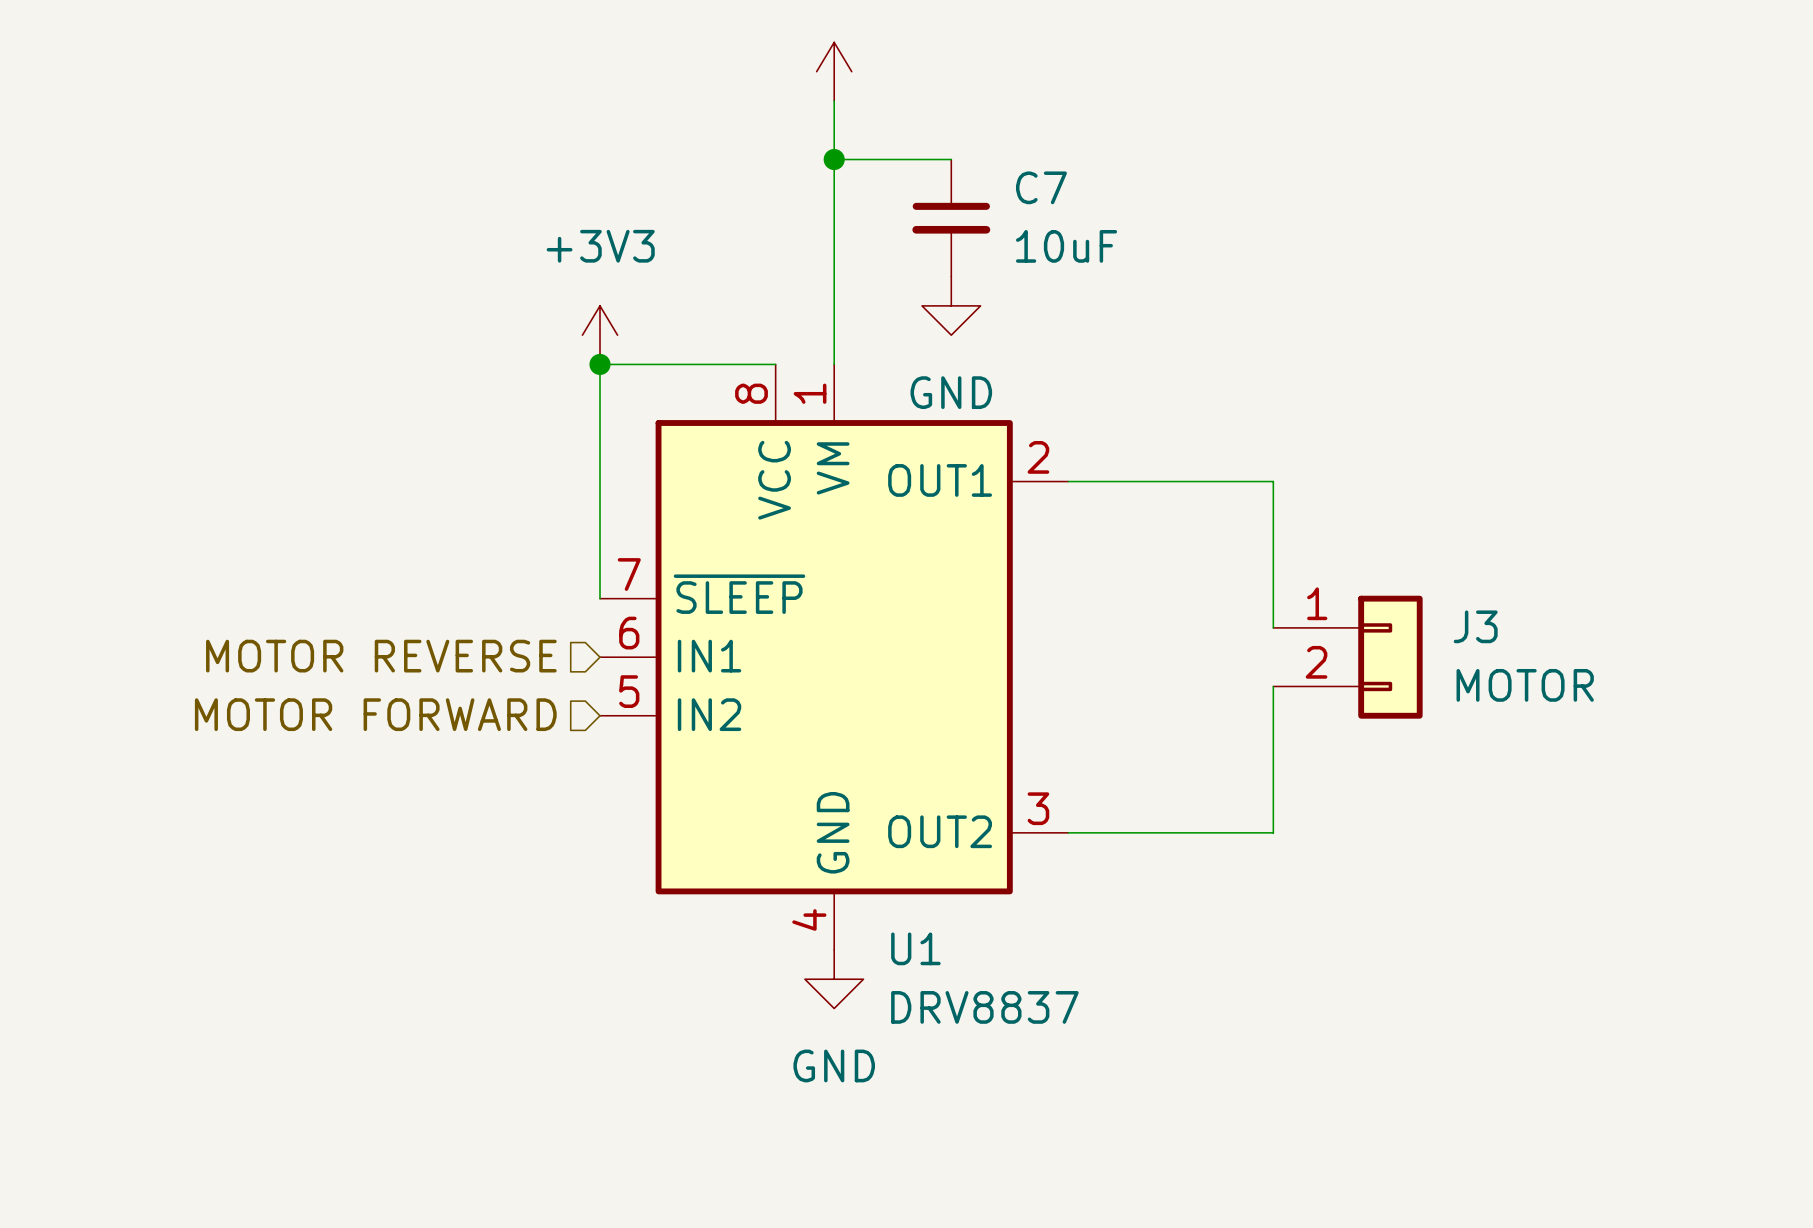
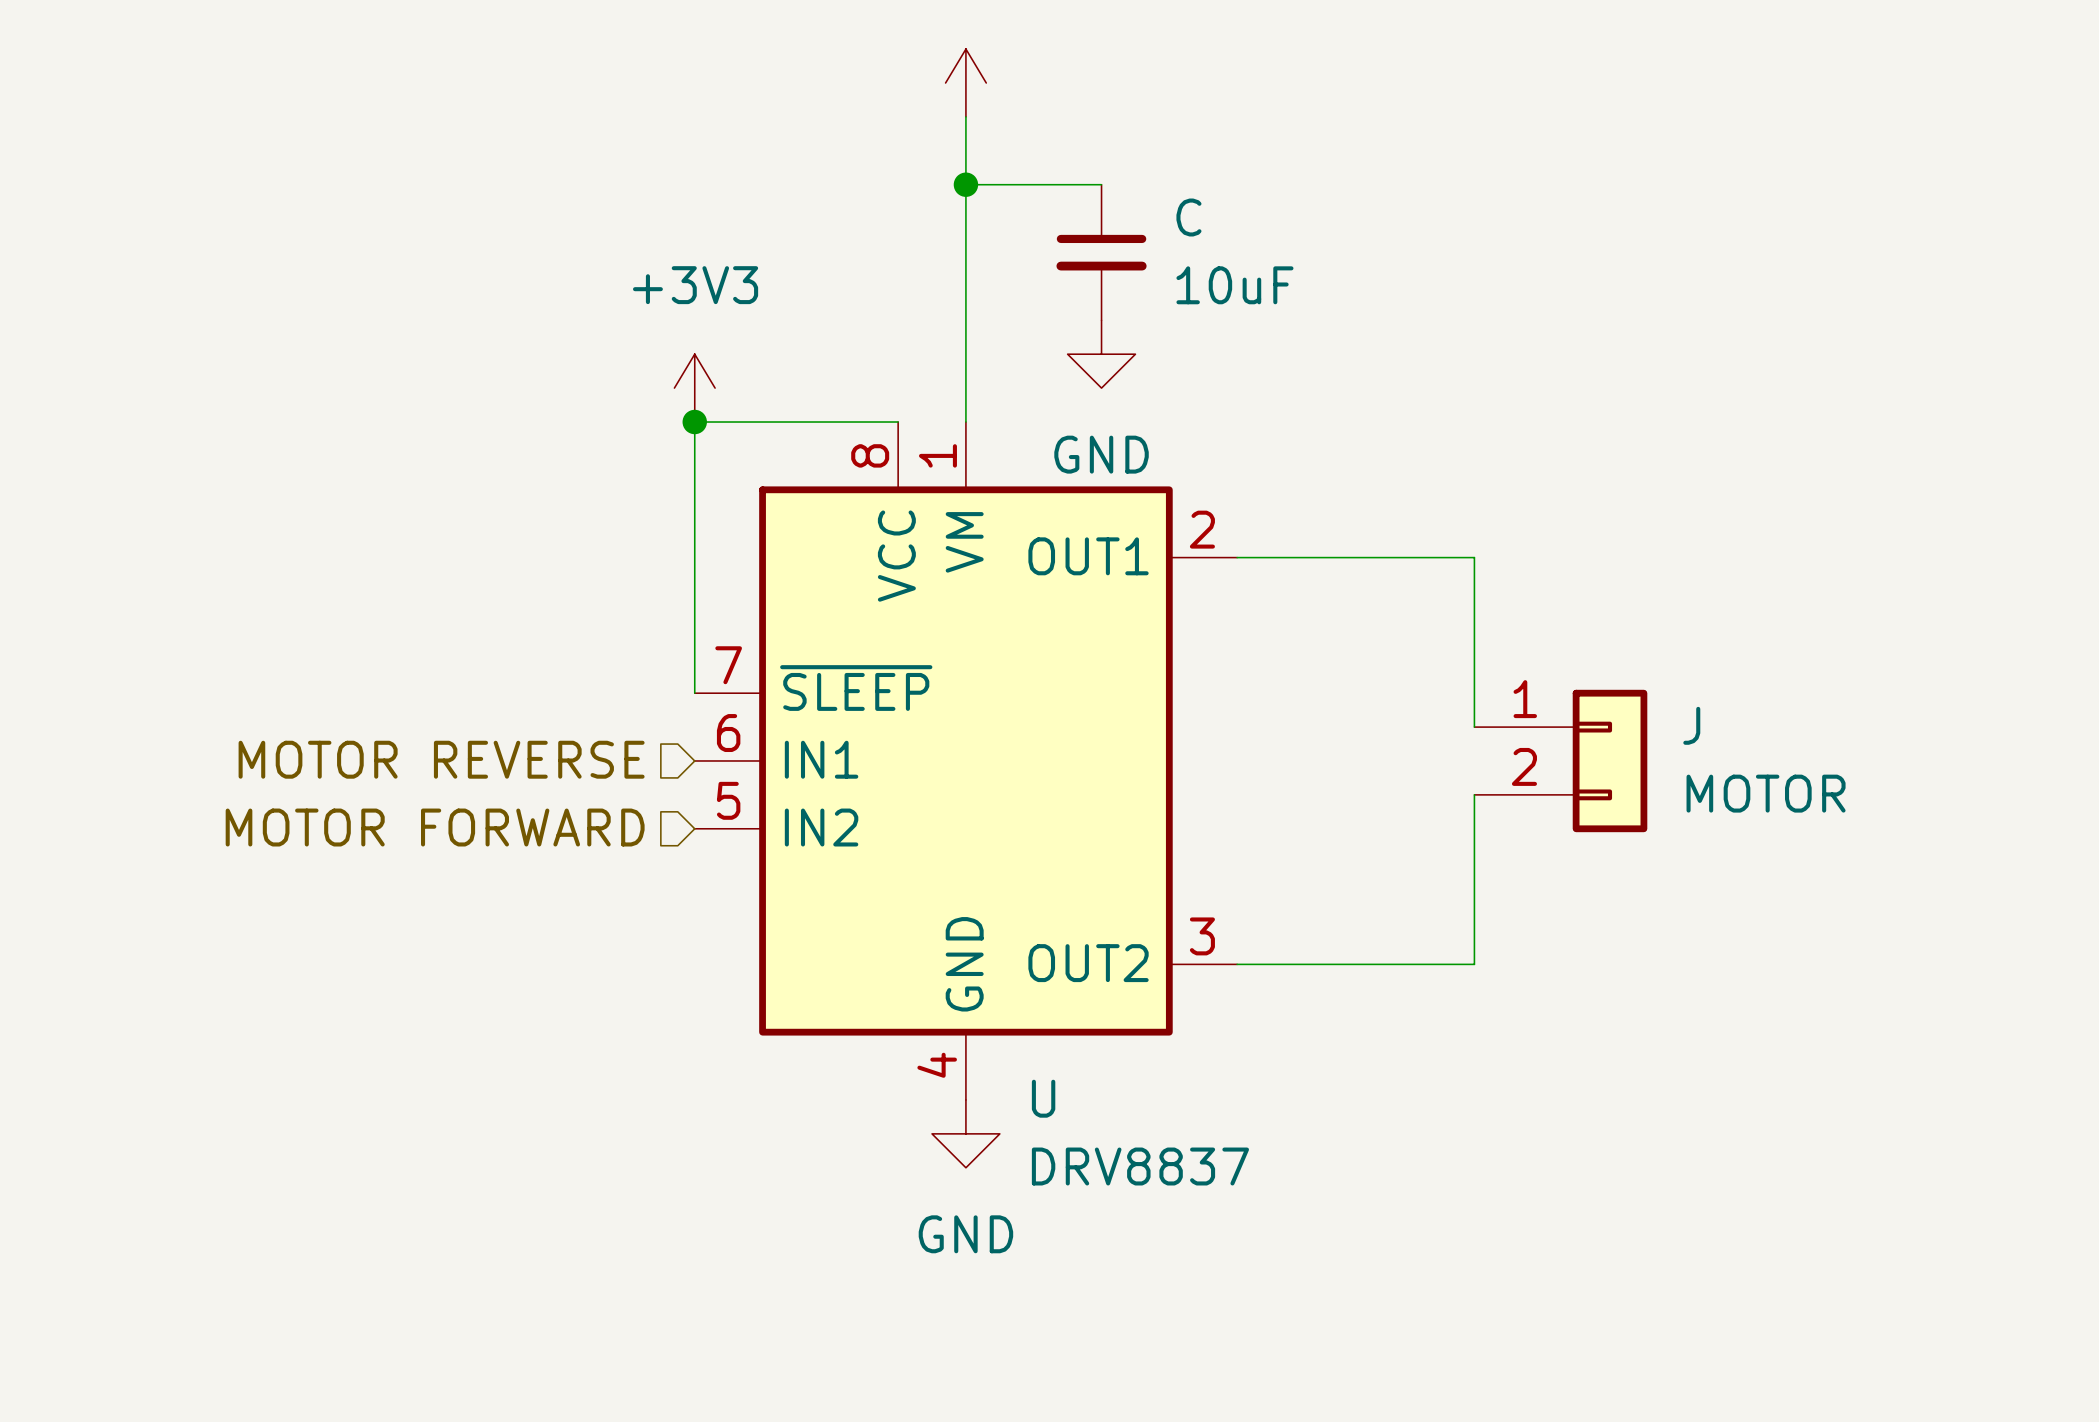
C7 name: C7 (1041, 187) -> C (1188, 217)
J3 name: J3 (1475, 626) -> J (1691, 725)
U1 name: U1 (915, 948) -> U (1043, 1098)

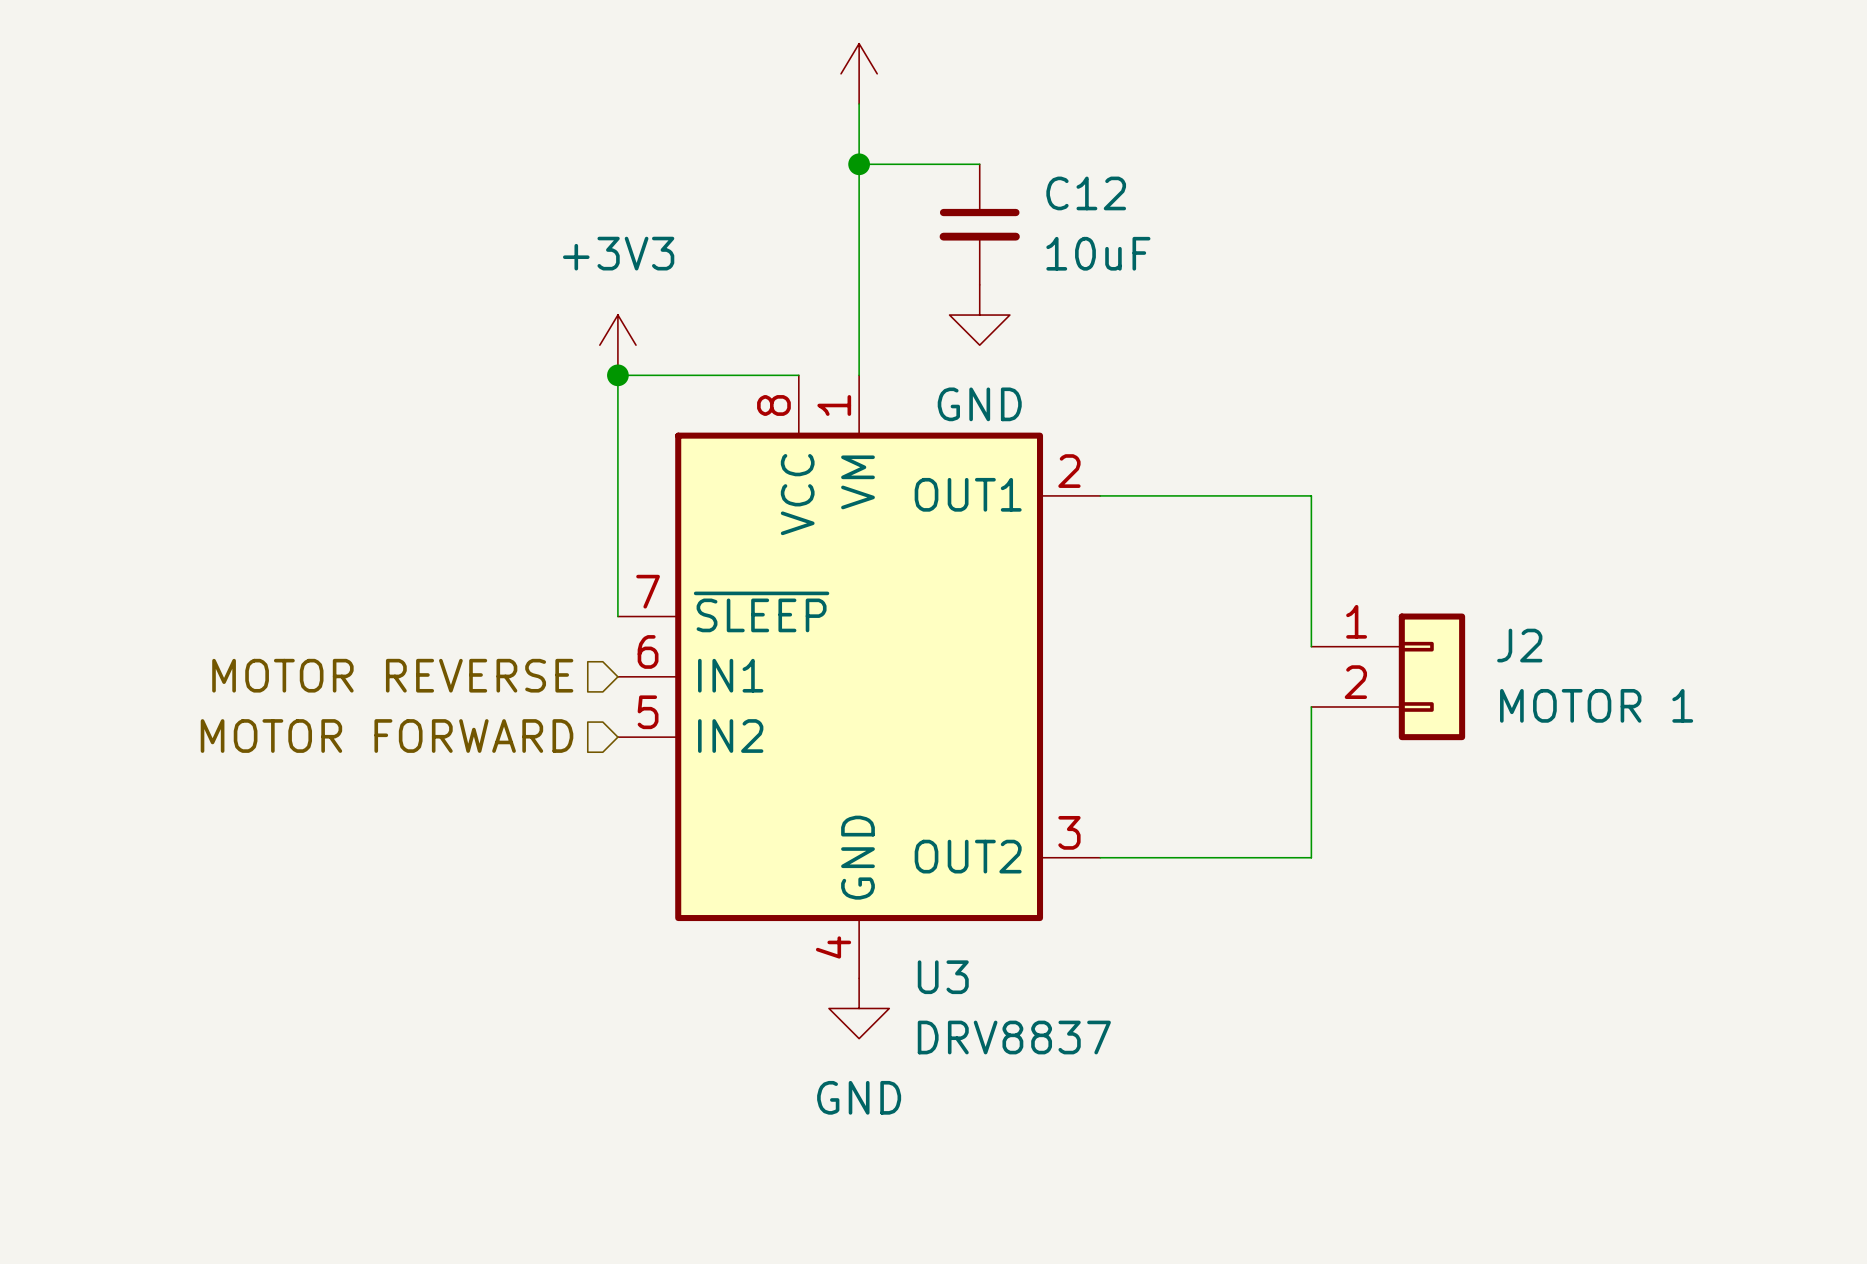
C name: C (1188, 217) -> C12 (1086, 193)
J name: J (1691, 725) -> J2 (1519, 645)
J value: MOTOR (1766, 793) -> MOTOR 1 (1596, 705)
U name: U (1043, 1098) -> U3 (943, 977)

